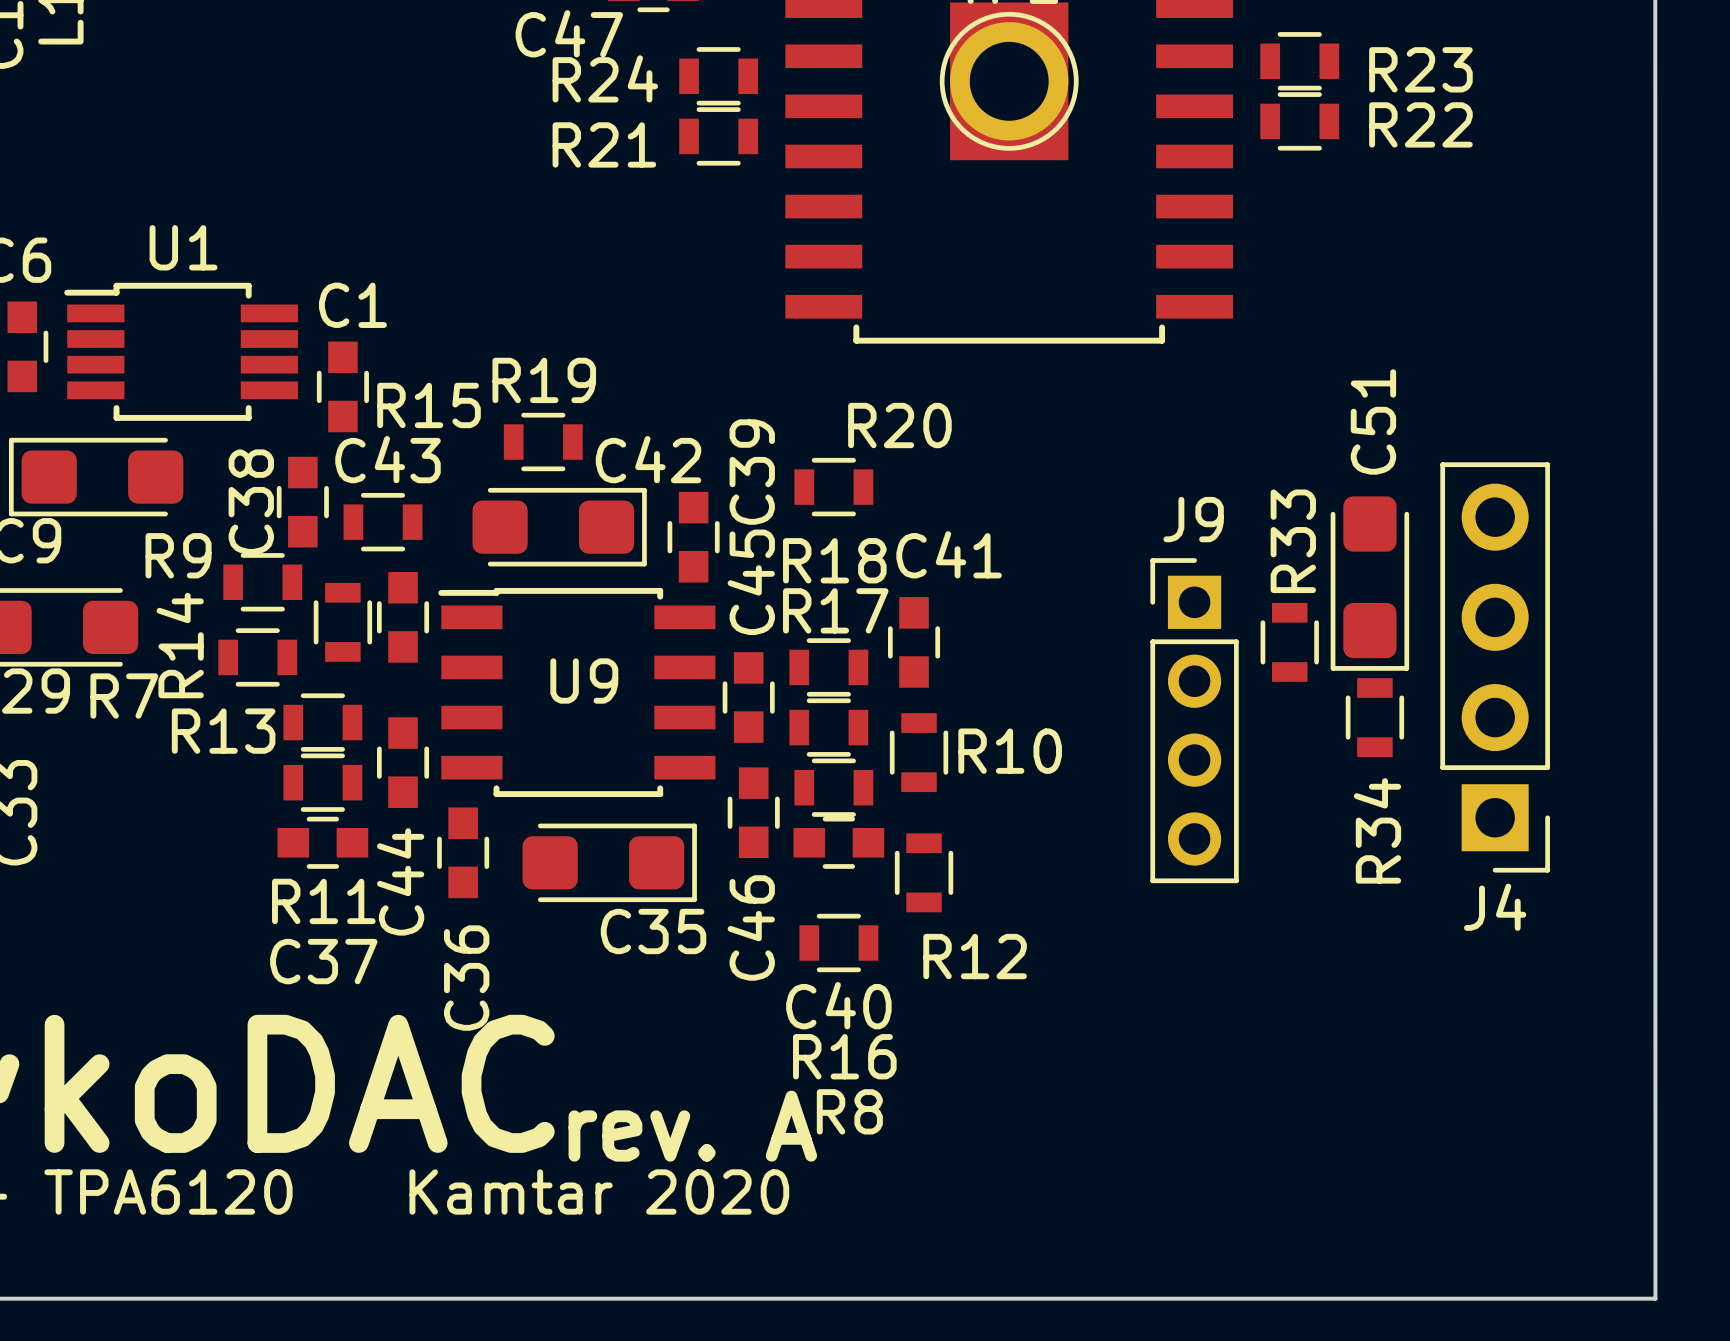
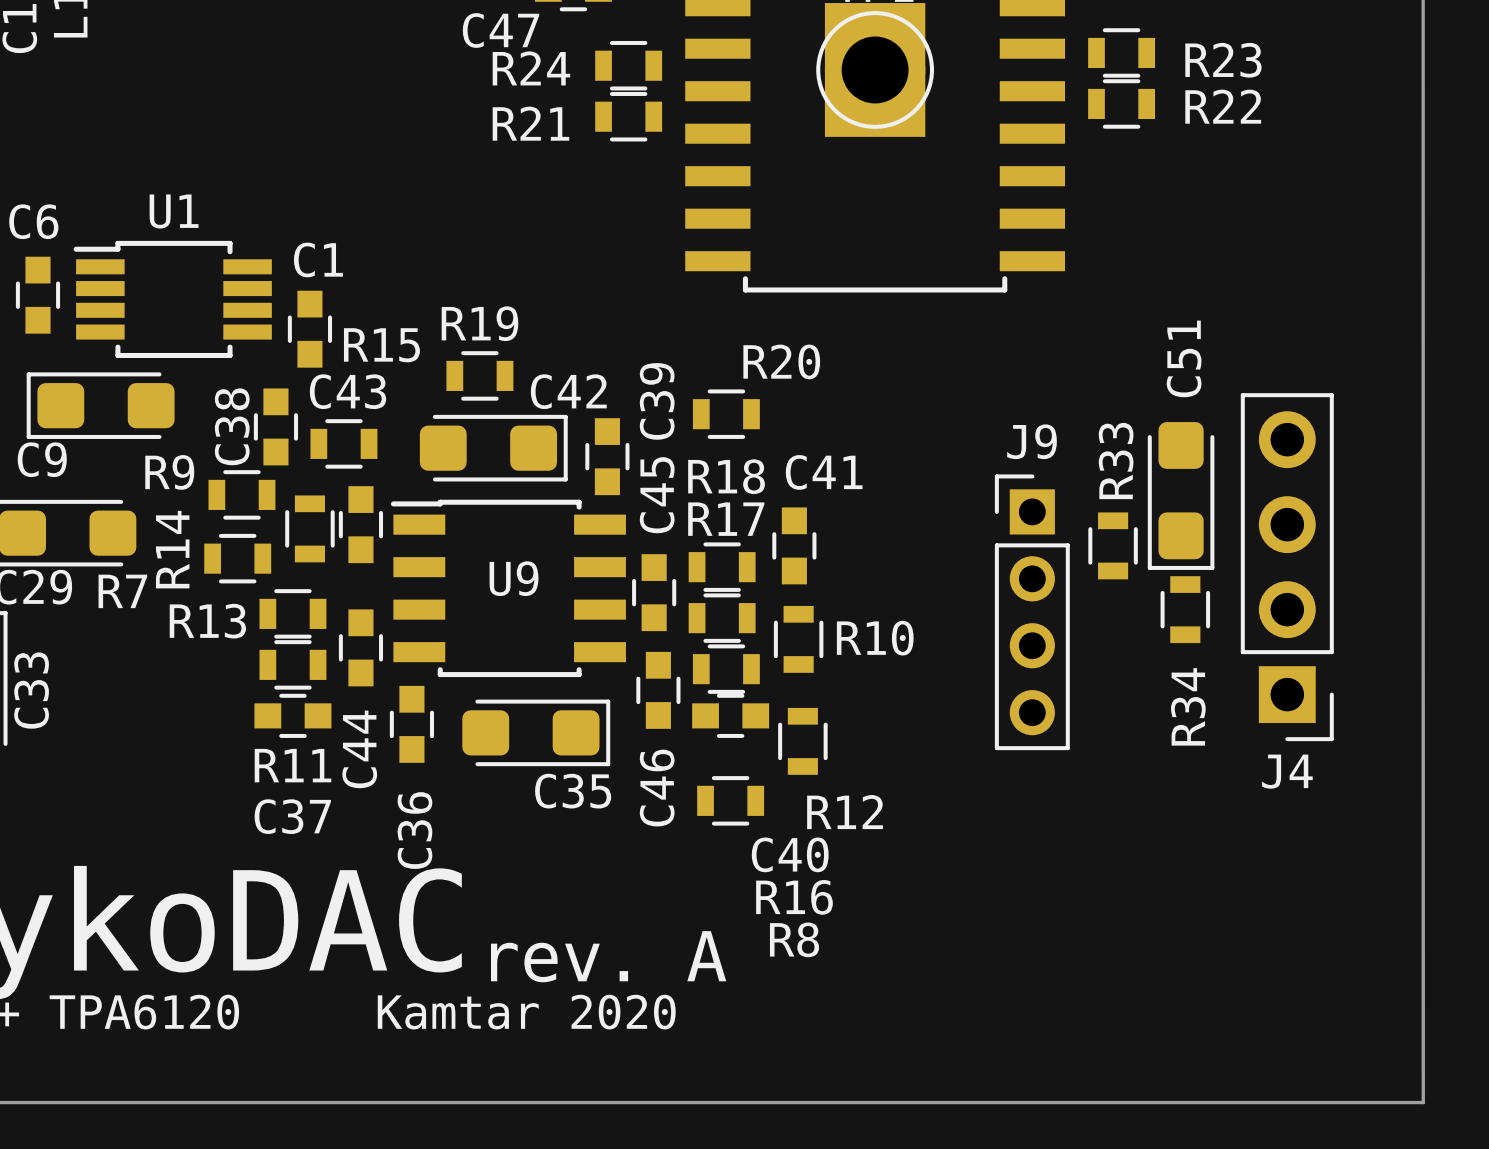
C40 name position: C40 (838, 1005) -> C40 (790, 854)
R16 name position: R16 (844, 1056) -> R16 (794, 897)
R8 name position: R8 (849, 1111) -> R8 (794, 939)

